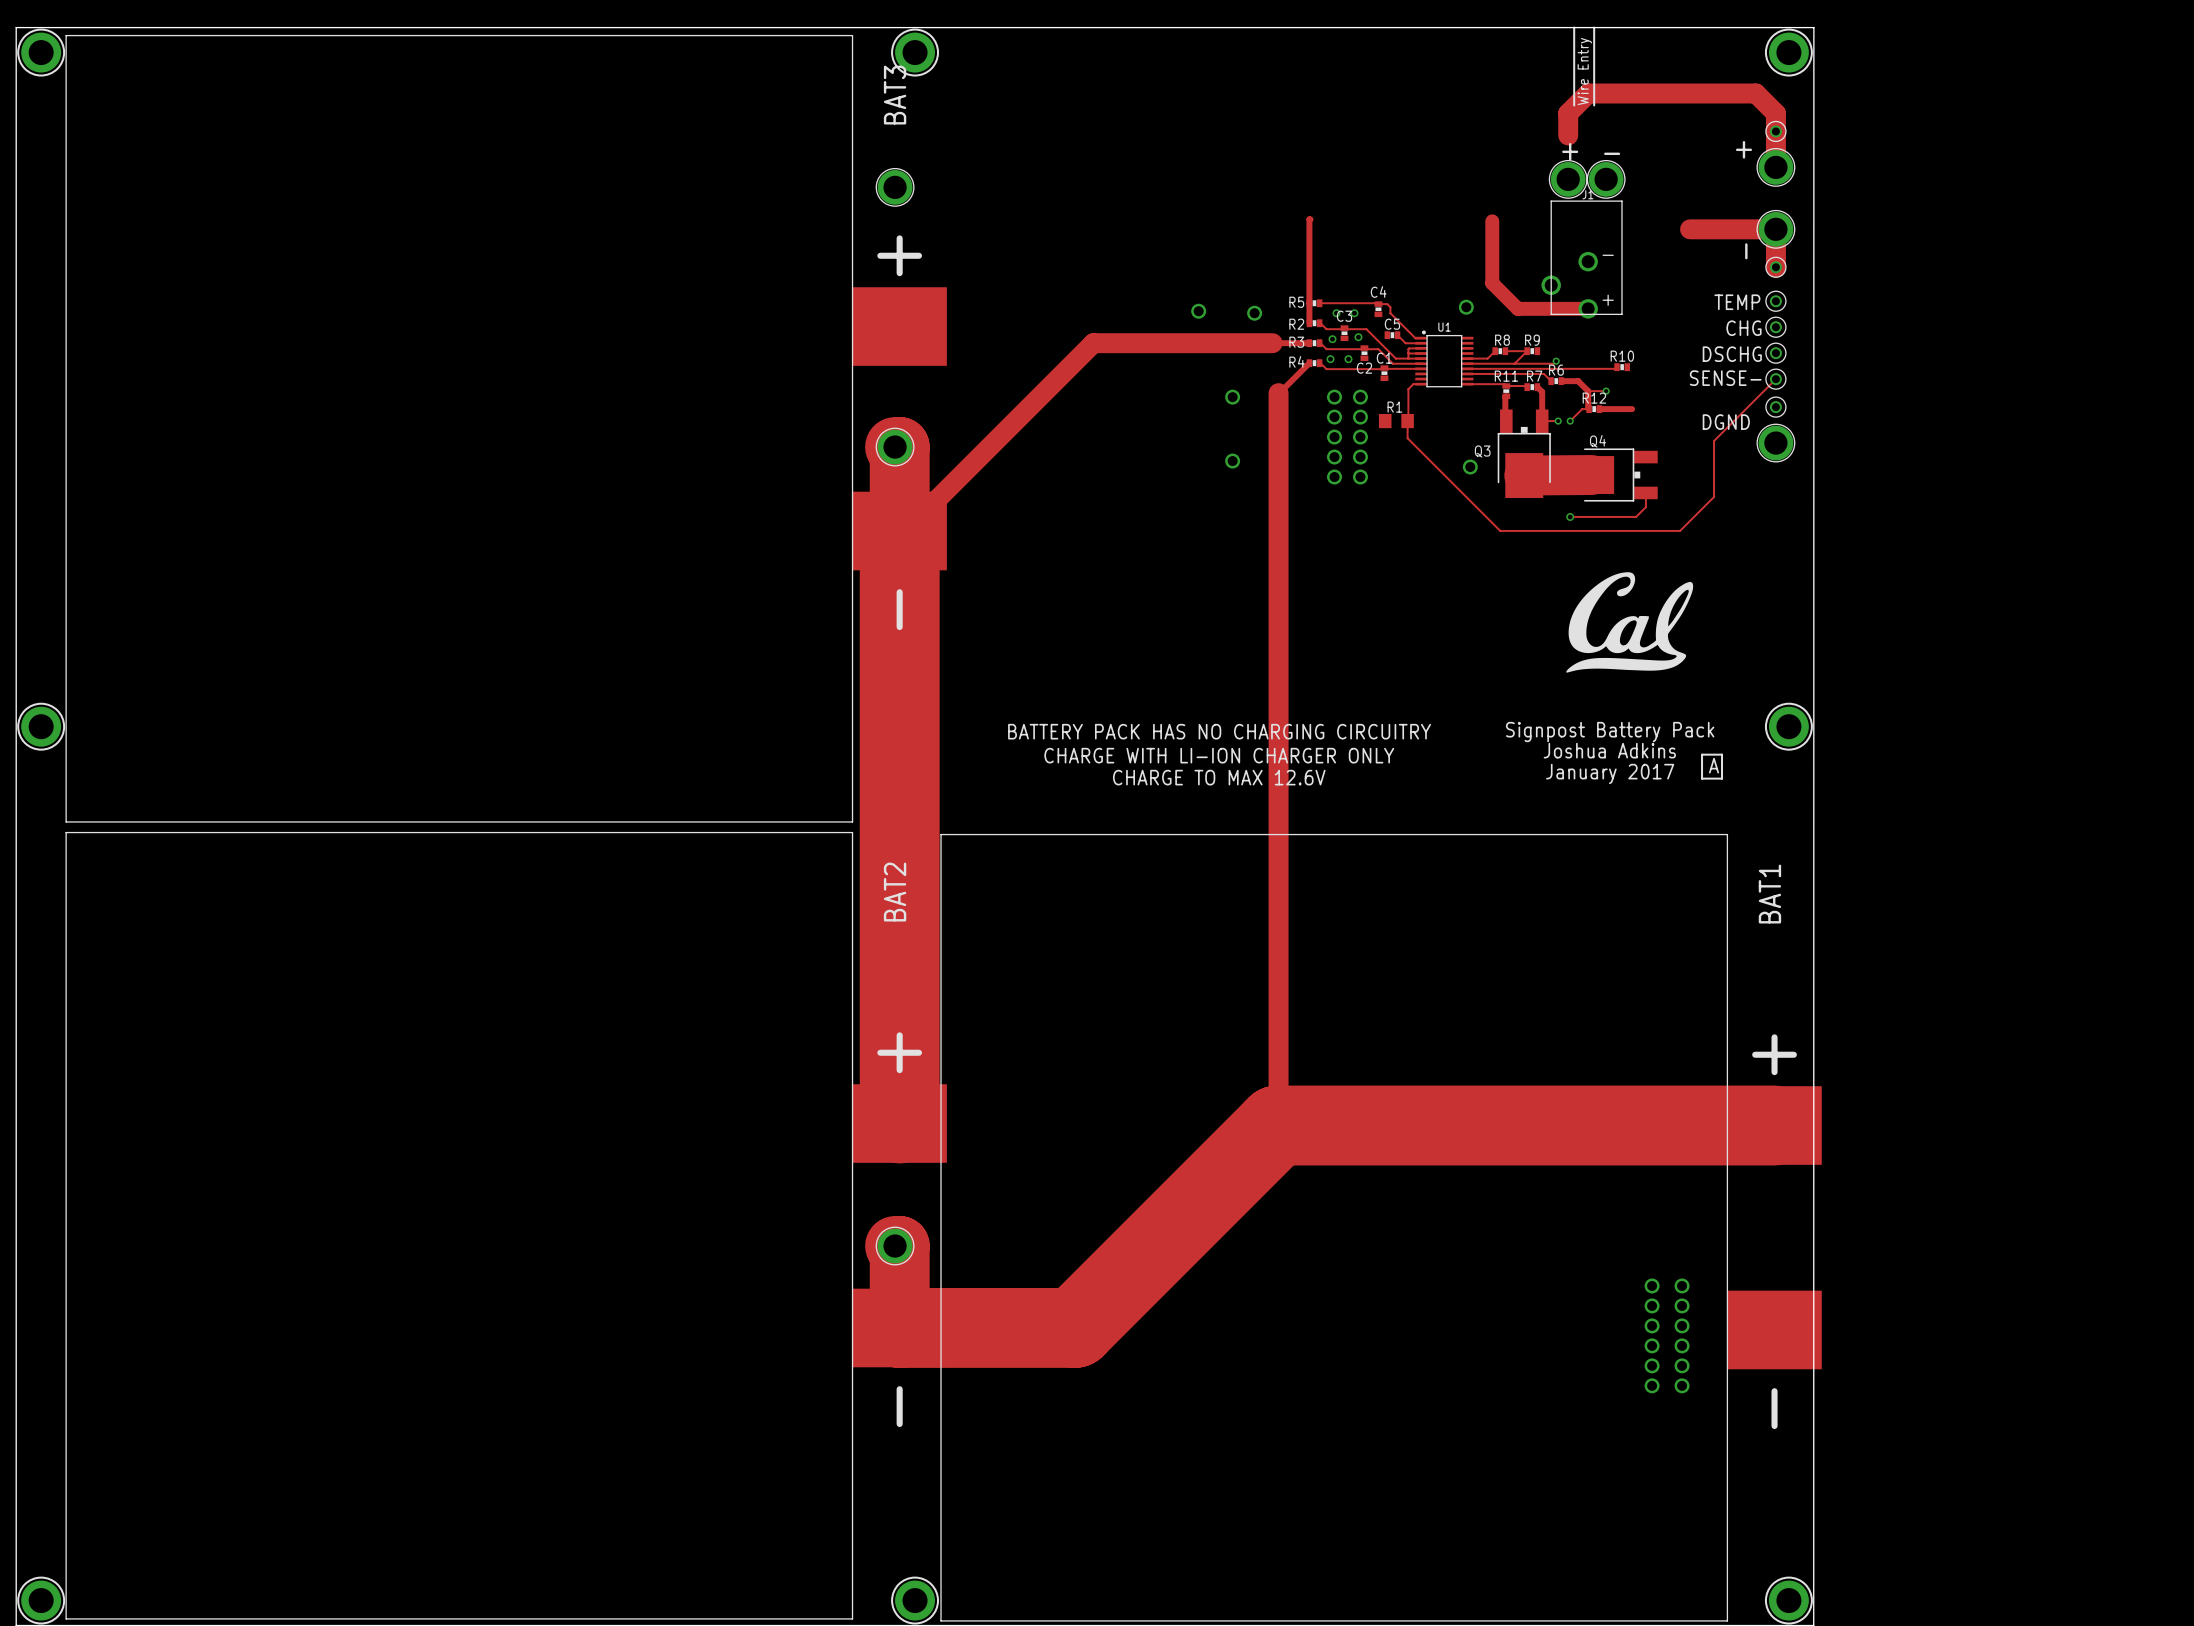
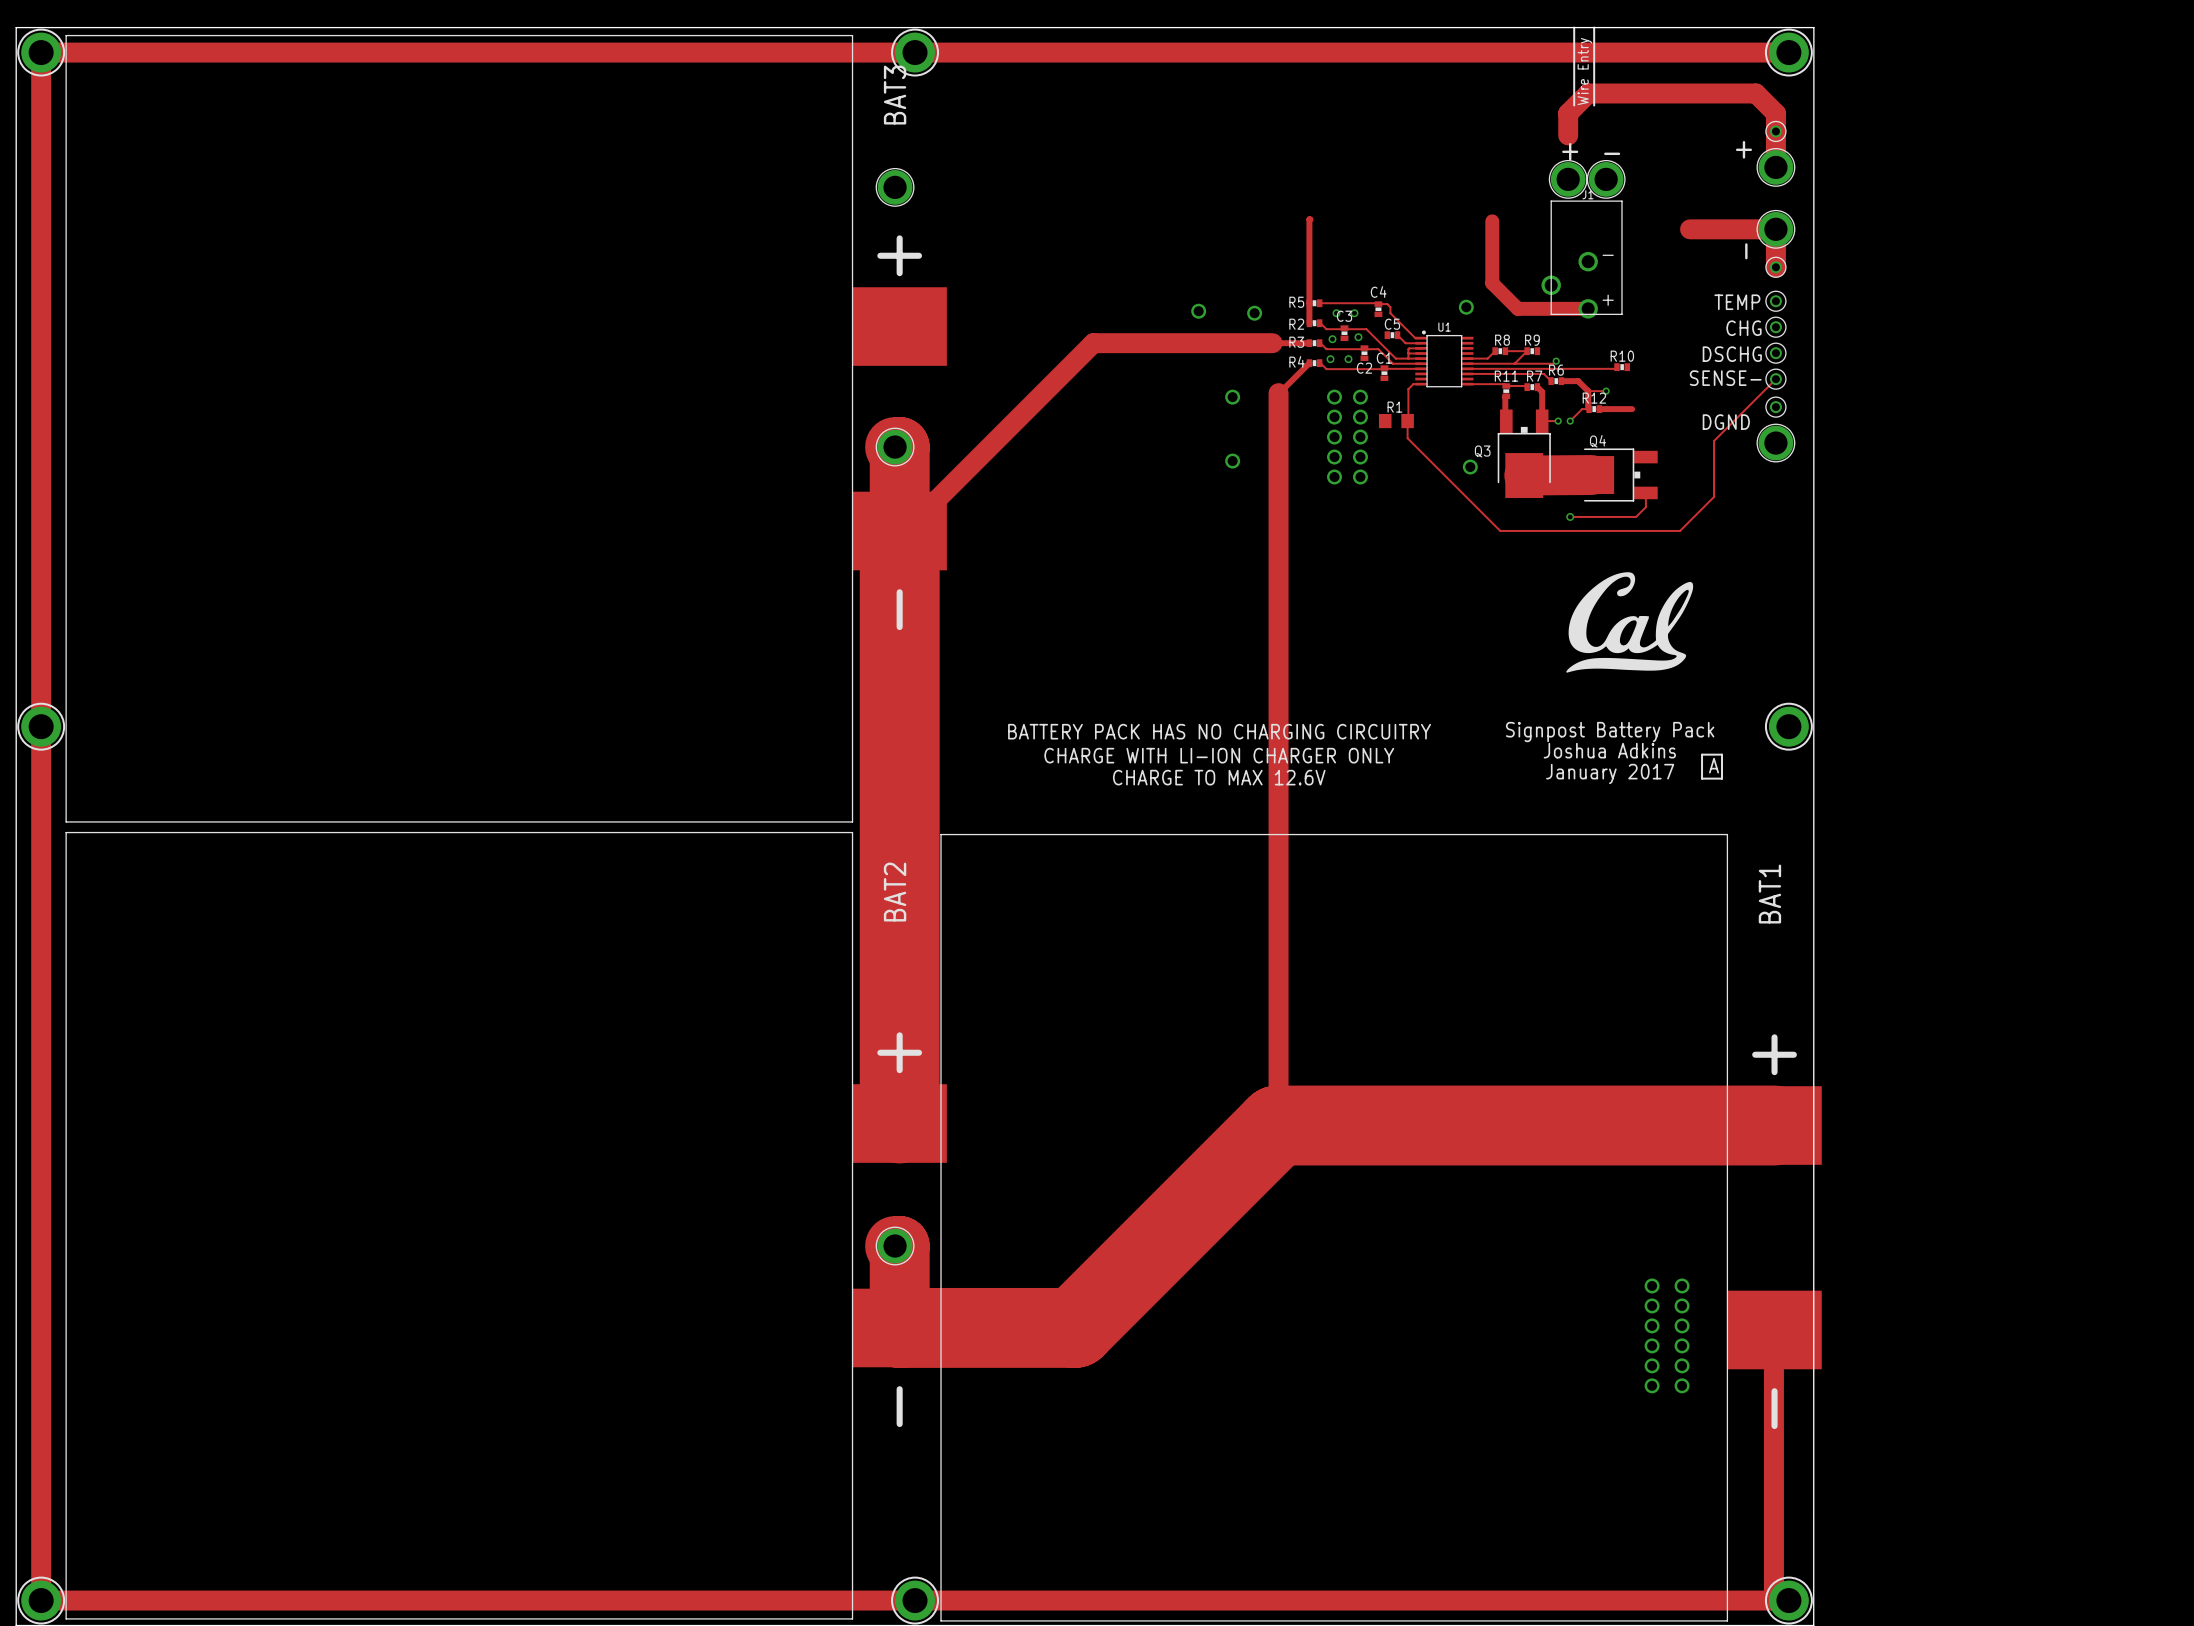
track: none -> (1788, 52) (41, 52) (41, 1600) (1788, 1600)
track: none -> (1773, 1325) (1773, 1600)

